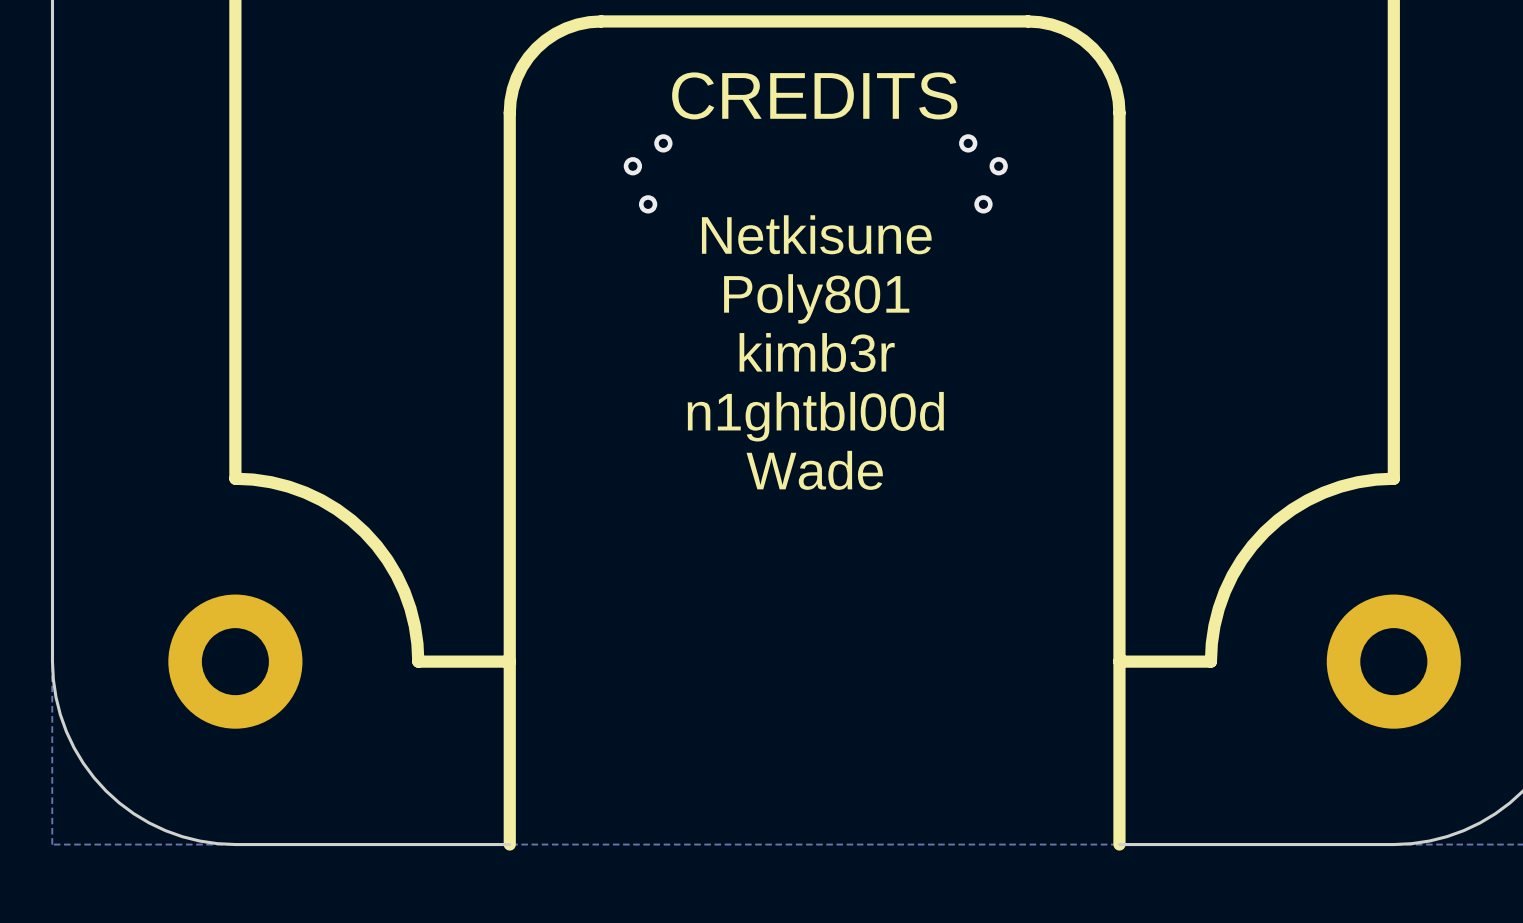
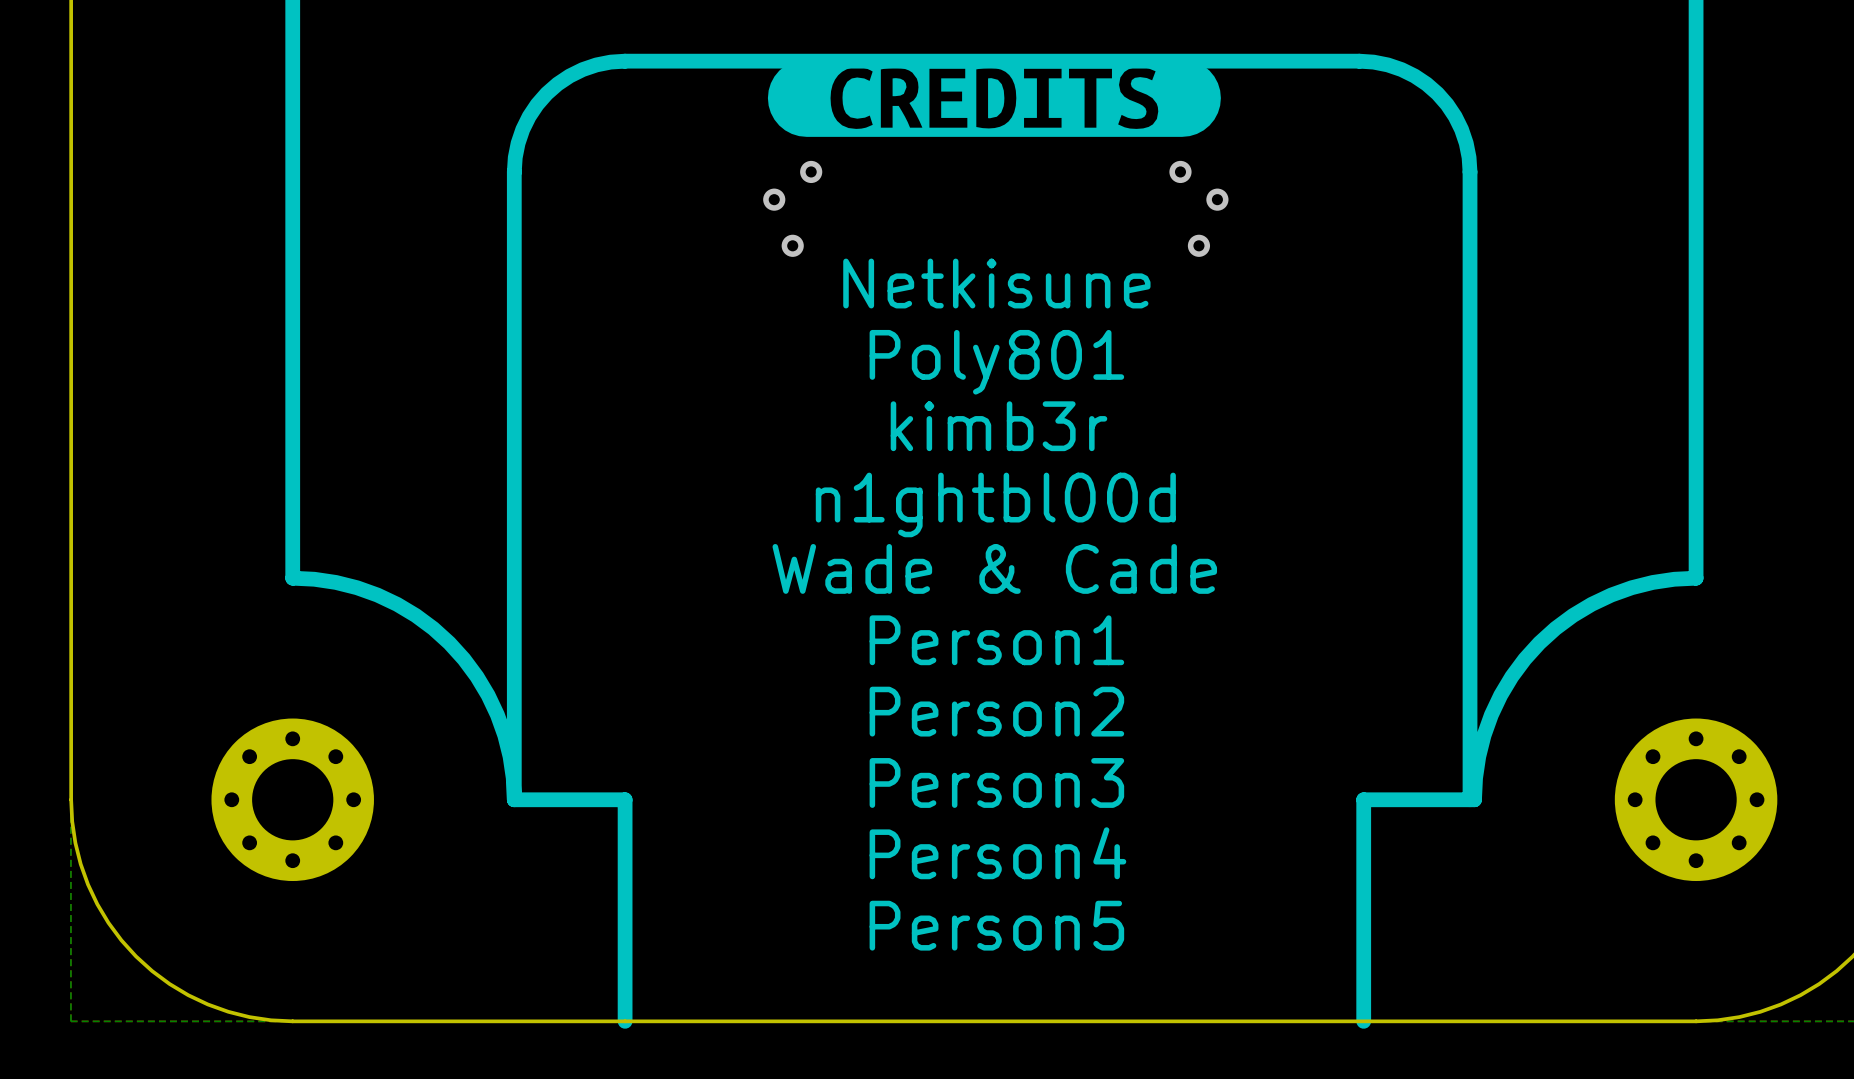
drawing: none -> [767, 59, 1221, 137]
text: CREDITS (814, 95) -> none
text: Wade (814, 470) -> Wade & Cade (994, 568)
text: none -> Person1 (996, 640)
text: none -> Person2 (996, 711)
part footprint: [168, 594, 303, 729] -> [211, 718, 374, 882]
part footprint: [1326, 594, 1461, 729] -> [1614, 718, 1778, 882]
text: none -> Person3 (996, 782)
line: (1119, 661) (1118, 100) (1112, 77) (1100, 57) (1092, 48) (1073, 33) (1063, 28) (1051, 24) (1028, 21) (589, 22) (577, 24) (555, 33) (536, 48) (528, 57) (516, 77) (512, 89) (509, 112) (509, 661) -> none
line: none -> (1470, 799) (1469, 157) (1461, 129) (1455, 116) (1437, 93) (1426, 84) (1401, 69) (1387, 64) (1359, 61) (625, 61) (596, 64) (569, 76) (557, 84) (546, 93) (529, 116) (518, 143) (514, 171) (514, 799)
text: none -> Person4 (997, 853)
text: none -> Person5 (996, 925)
board edge: none -> (1363, 1021) (625, 1021)

